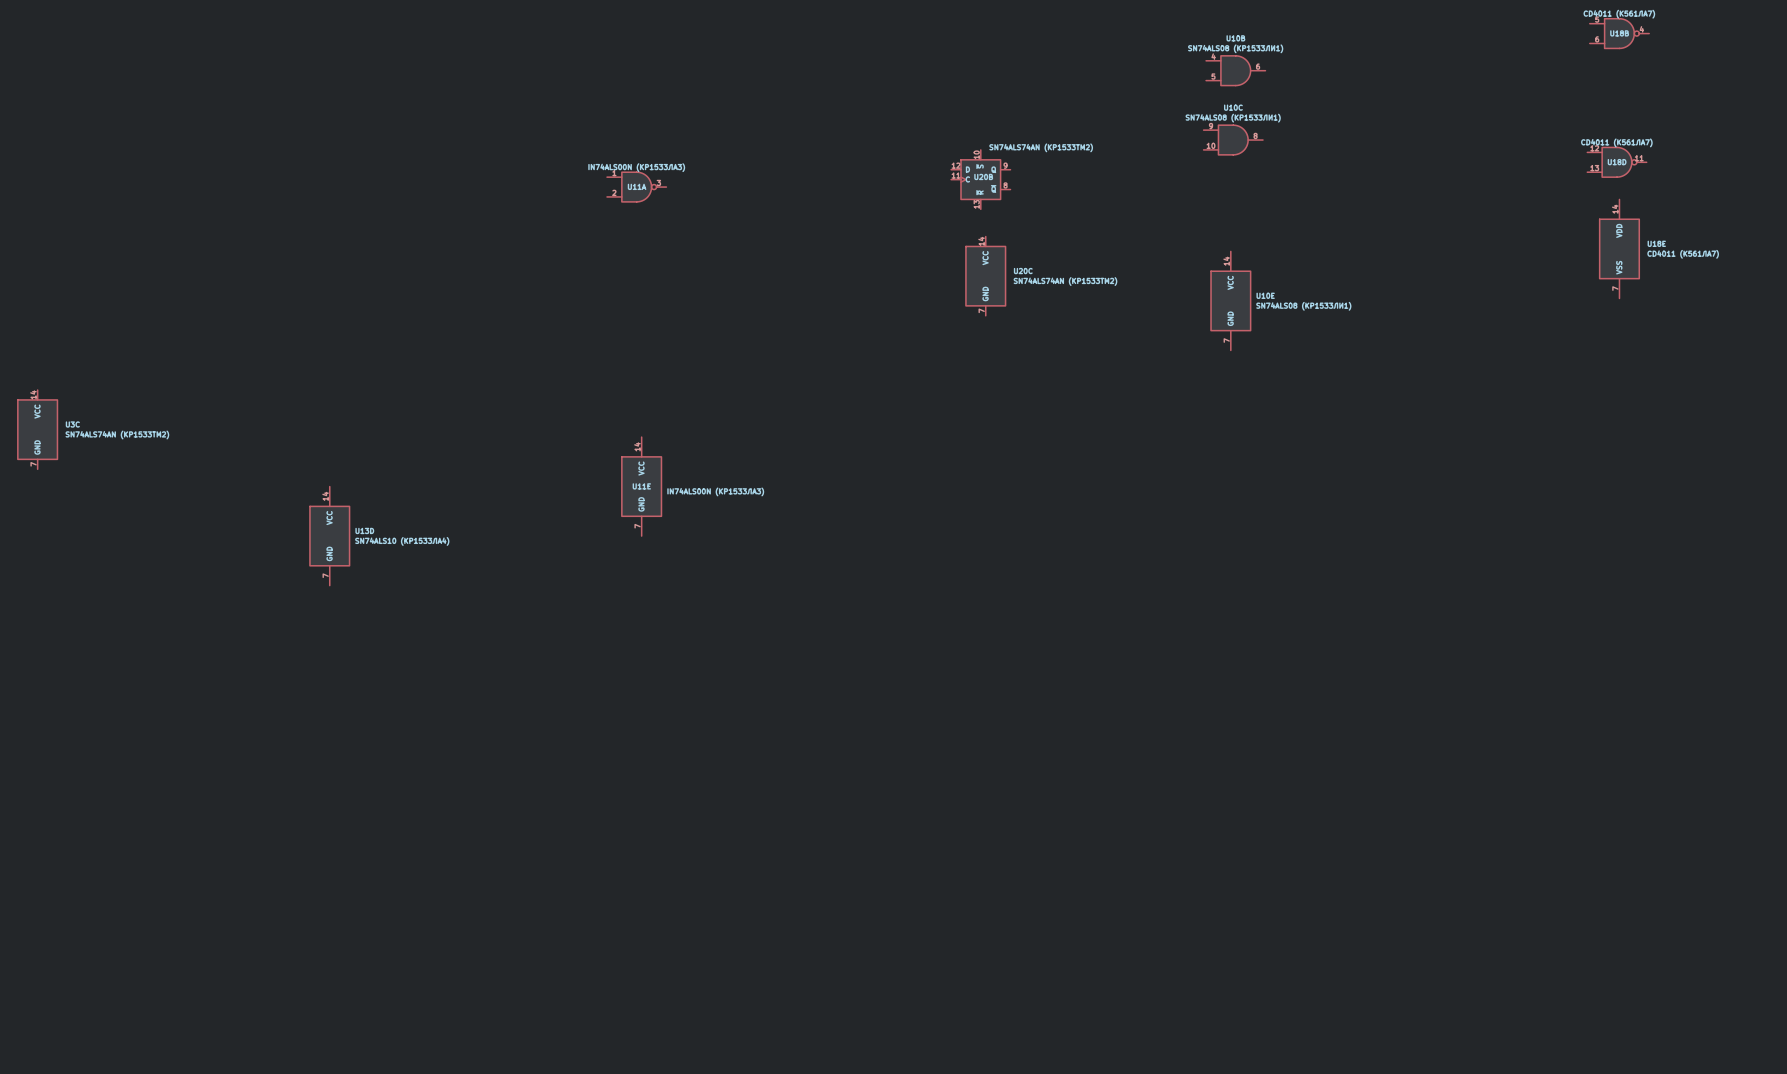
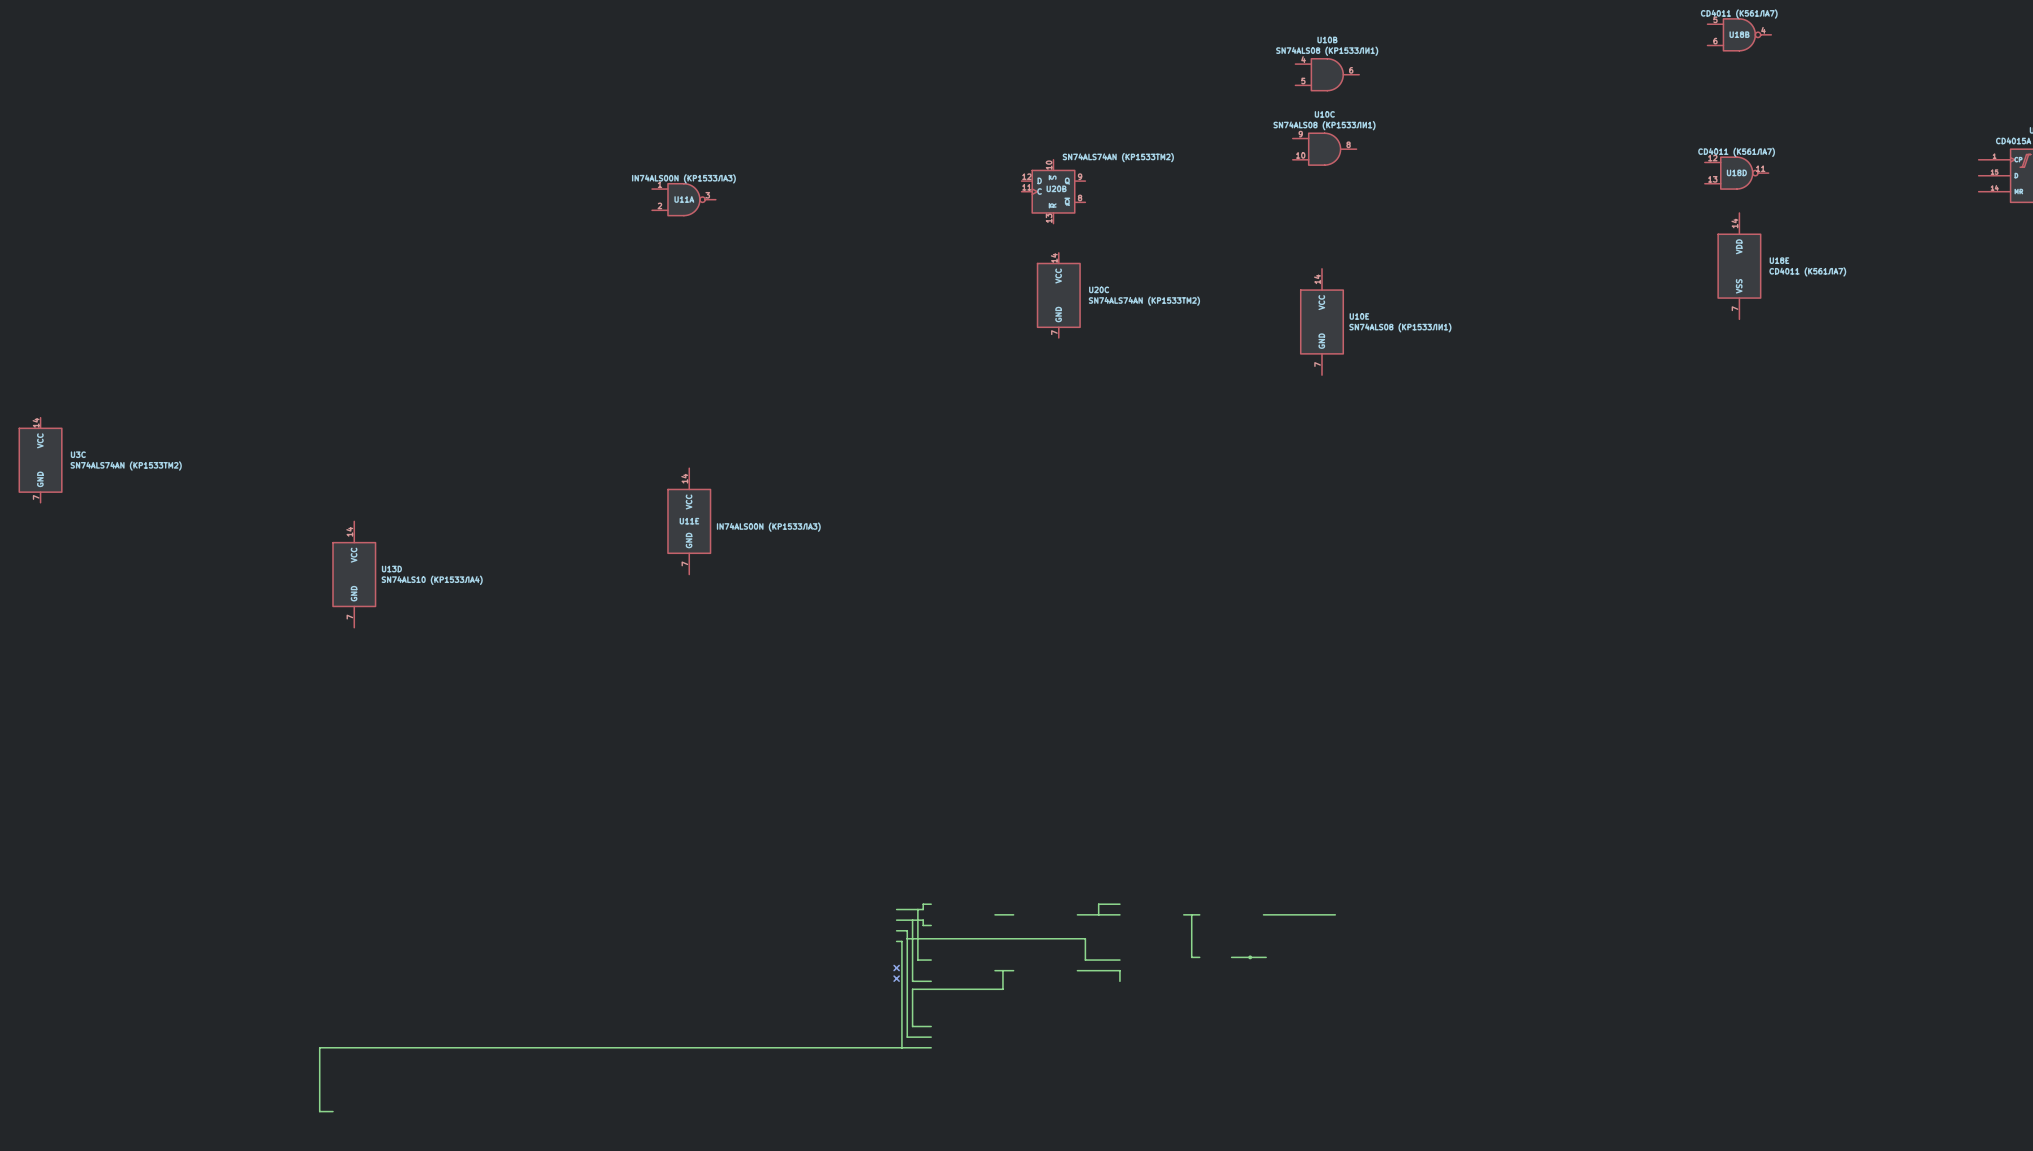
wire: none -> (931, 904) (923, 904) (923, 909) (896, 909)
wire: none -> (1119, 904) (1098, 904) (1098, 914)
wire: none -> (917, 909) (917, 960) (931, 960)
wire: none -> (994, 914) (1013, 914)
wire: none -> (1077, 914) (1119, 914)
wire: none -> (1183, 914) (1199, 914)
wire: none -> (1191, 914) (1191, 957) (1199, 957)
wire: none -> (1263, 914) (1335, 914)
wire: none -> (896, 920) (923, 920) (923, 925) (931, 925)
wire: none -> (912, 920) (912, 981) (931, 981)
wire: none -> (896, 930) (907, 930) (907, 1037) (931, 1037)
wire: none -> (907, 938) (1085, 938) (1085, 960) (1119, 960)
wire: none -> (896, 941) (901, 941) (901, 1047)
wire: none -> (1231, 957) (1266, 957)
junction: none -> (1250, 957)
no-connect mark: none -> (896, 968)
wire: none -> (994, 970) (1013, 970)
wire: none -> (1002, 970) (1002, 989) (912, 989) (912, 1026) (931, 1026)
wire: none -> (1077, 970) (1119, 970) (1119, 981)
no-connect mark: none -> (896, 978)
wire: none -> (931, 1047) (319, 1047) (319, 1111) (333, 1111)

